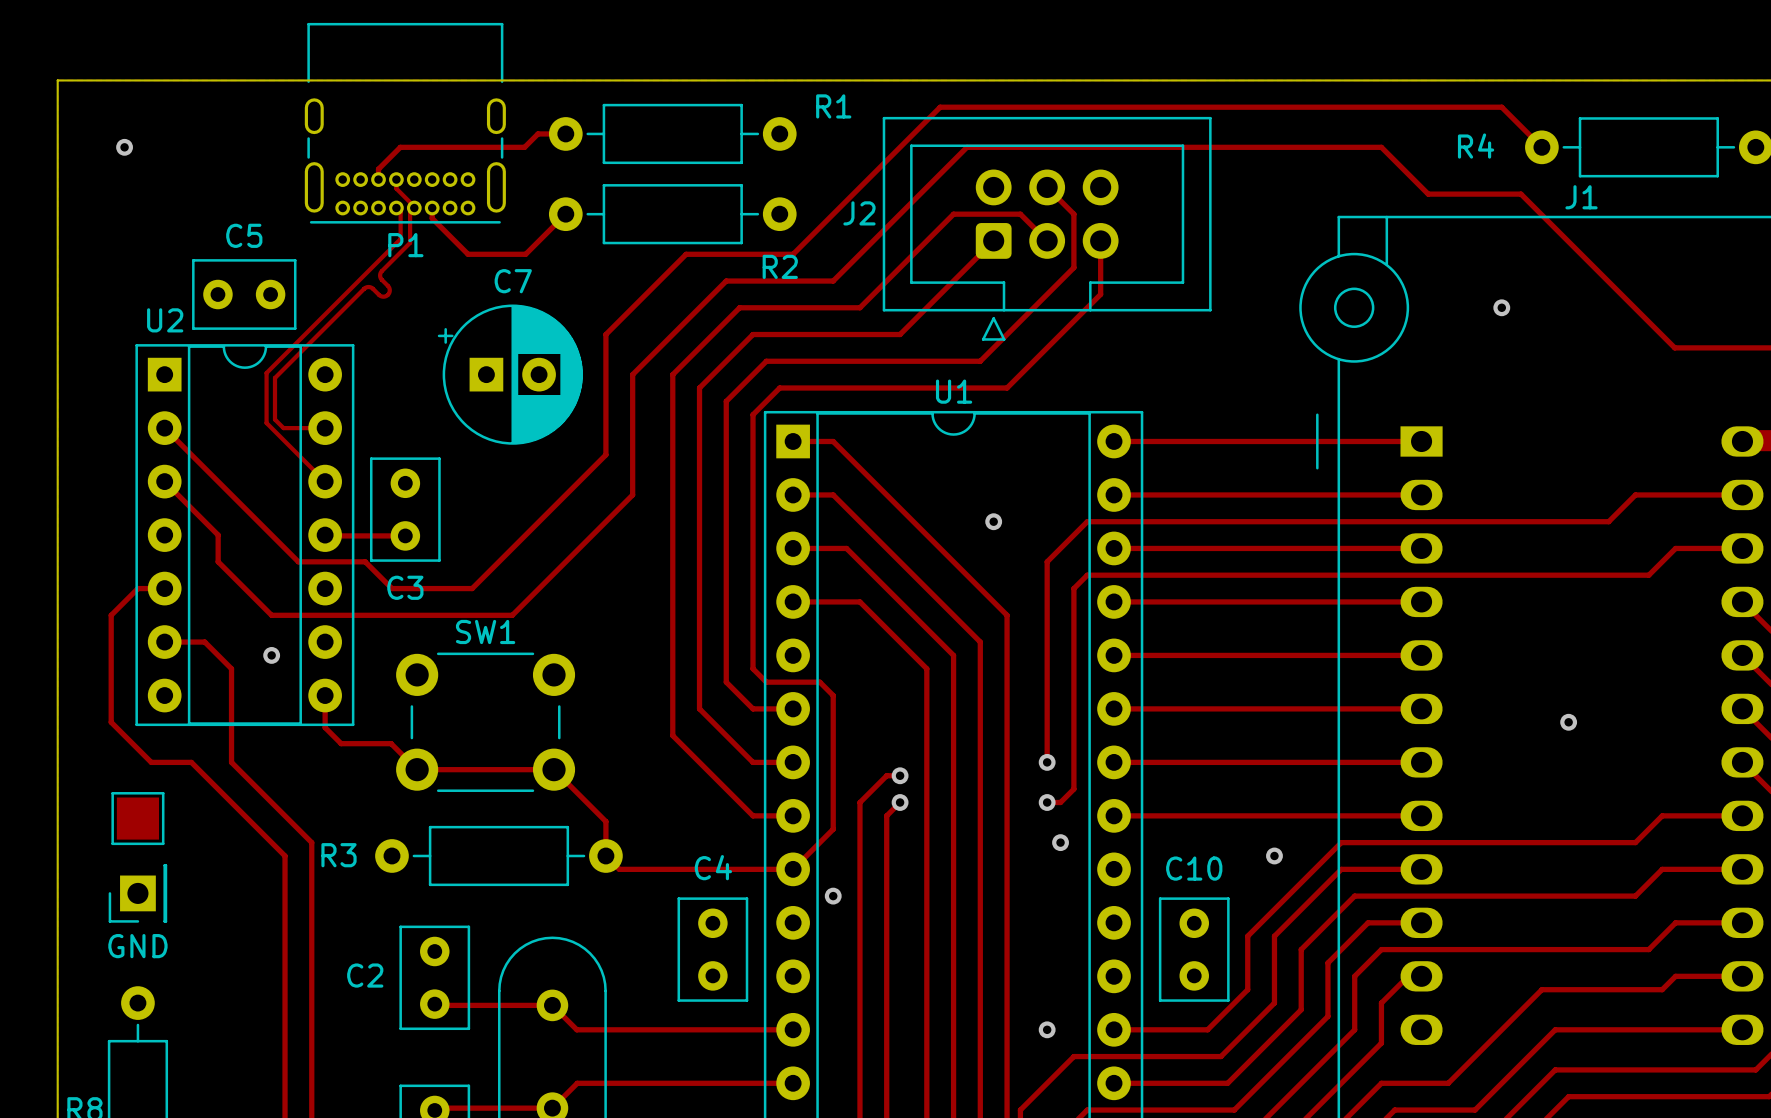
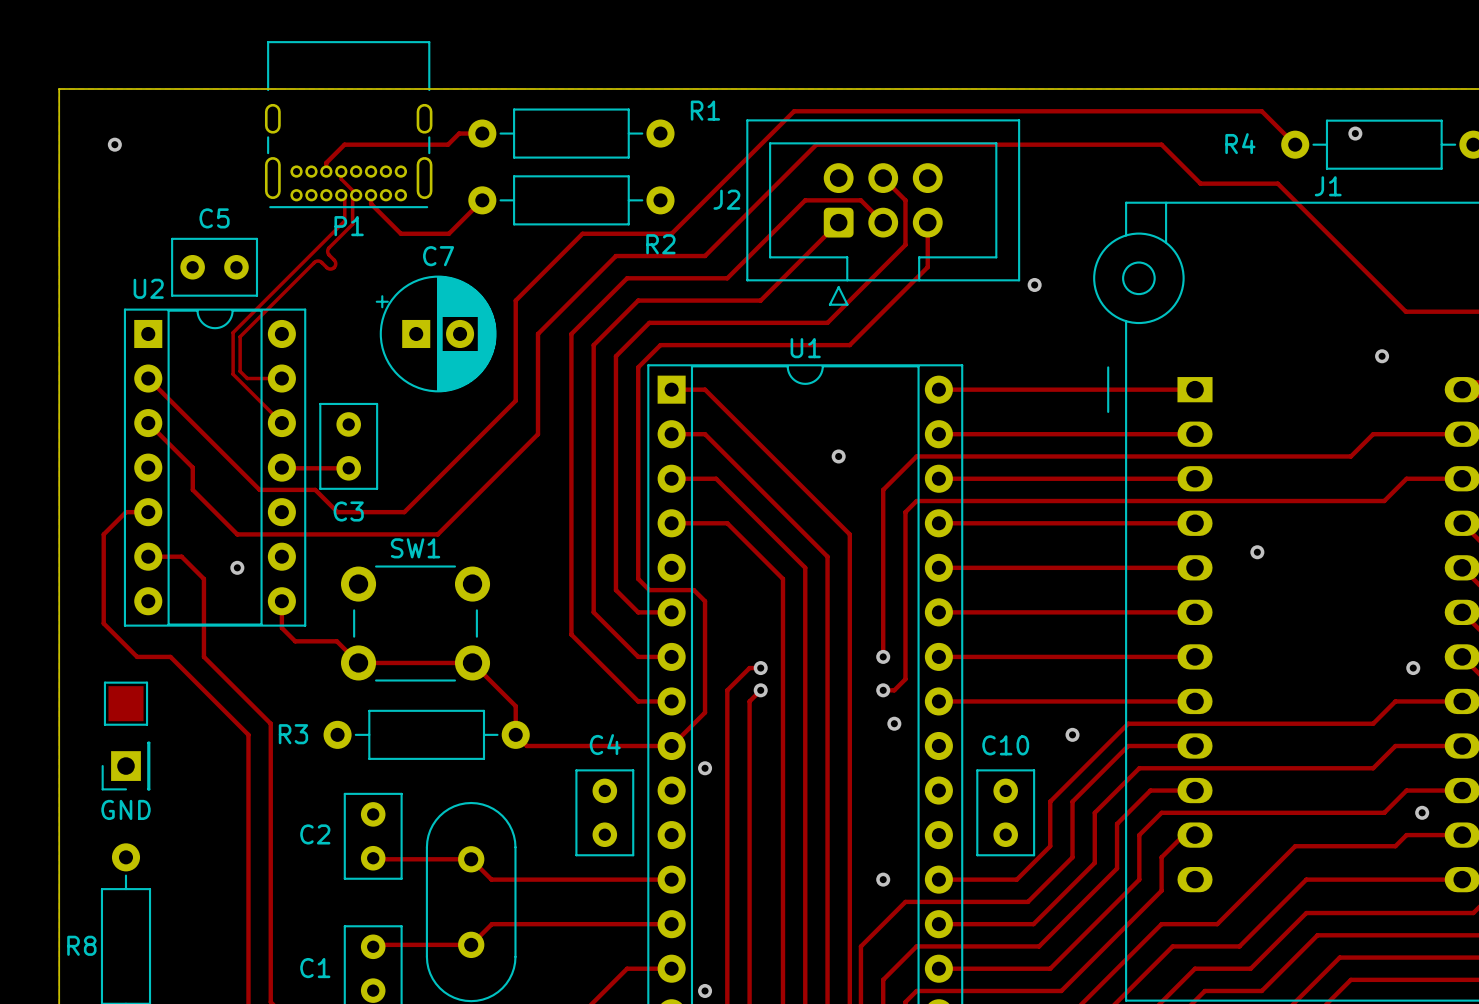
via: none -> (1355, 133)
via: (1501, 307) -> none
via: none -> (1034, 284)
via: none -> (1382, 356)
via: none -> (1257, 552)
via: (1568, 722) -> none
via: none -> (1413, 668)
via: none -> (1422, 812)

